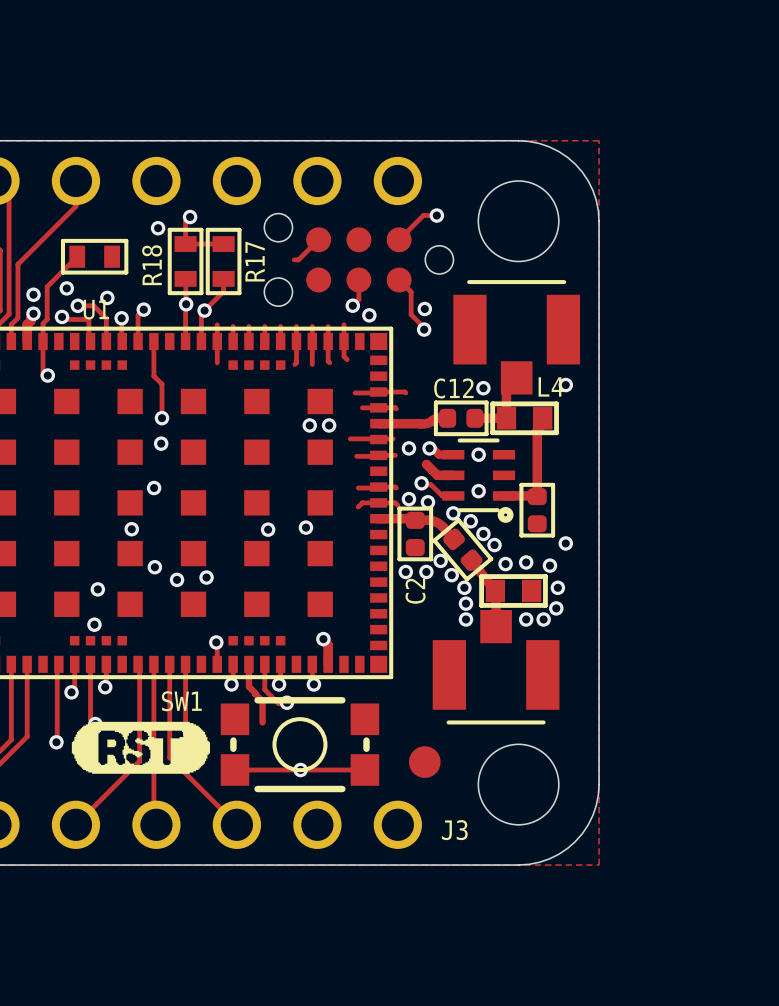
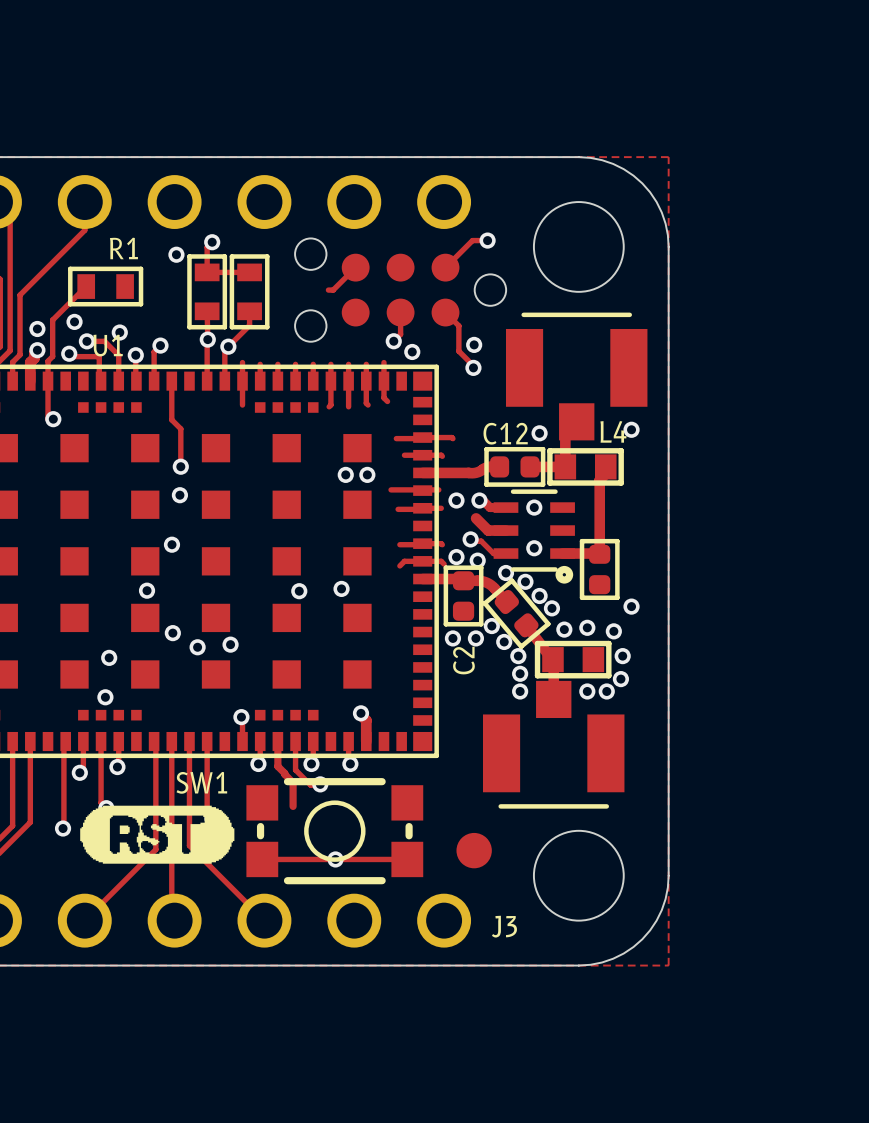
R1 name: none -> R1 (123, 248)
R17 name: R17 (255, 261) -> none
R18 name: R18 (152, 265) -> none

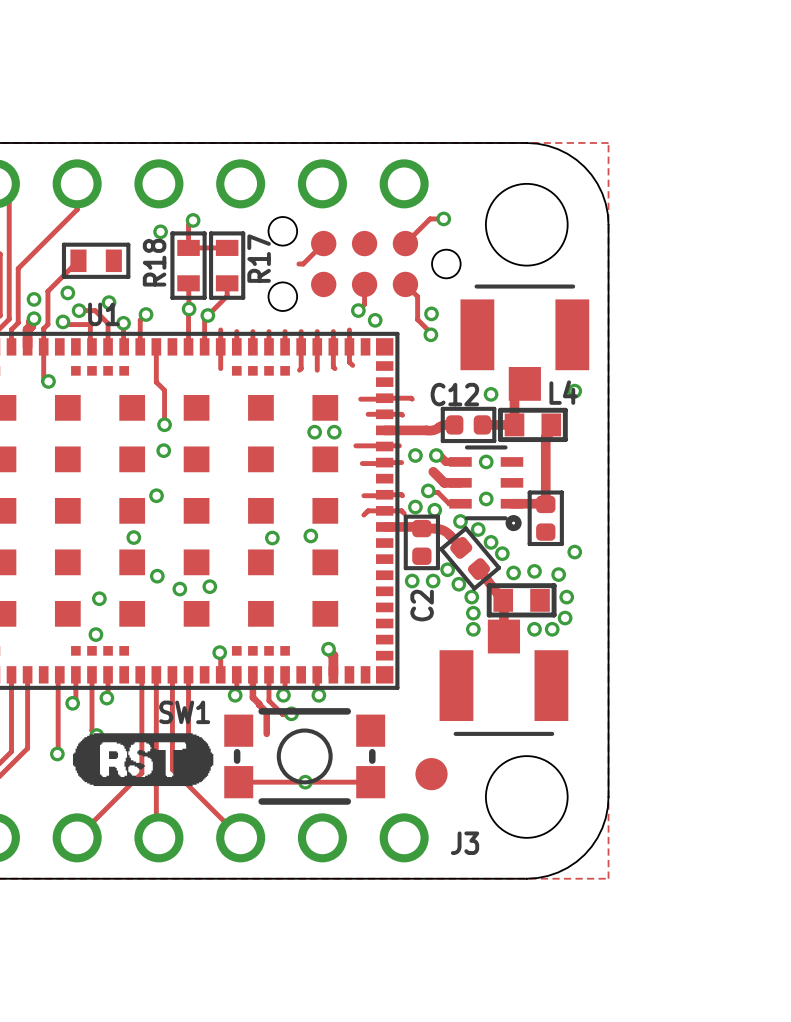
R1 name: R1 (123, 248) -> none
R17 name: none -> R17 (259, 258)
R18 name: none -> R18 (154, 262)

